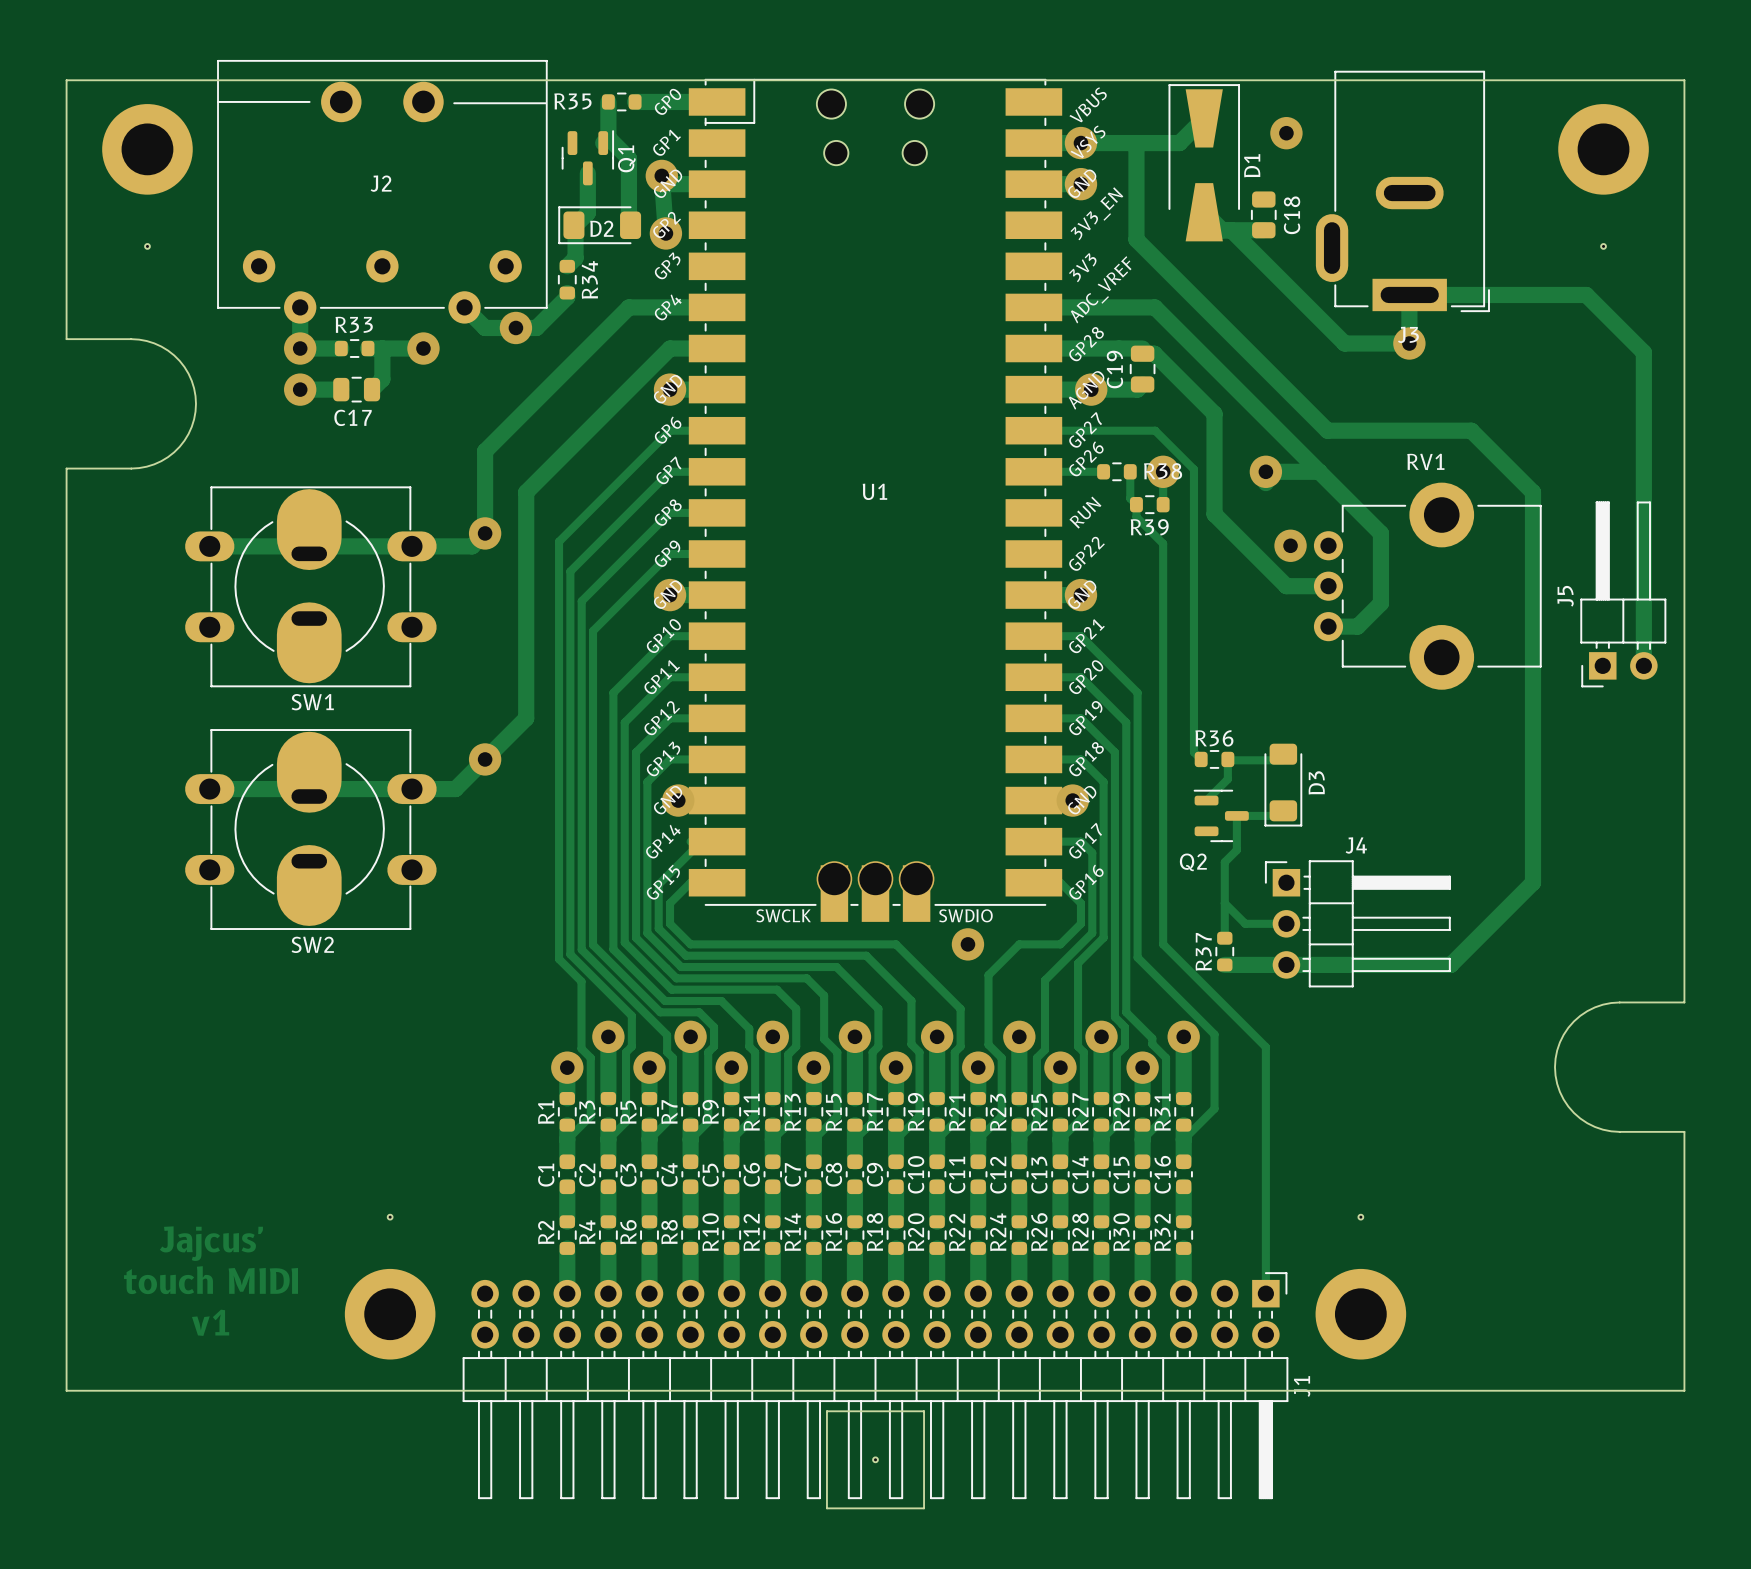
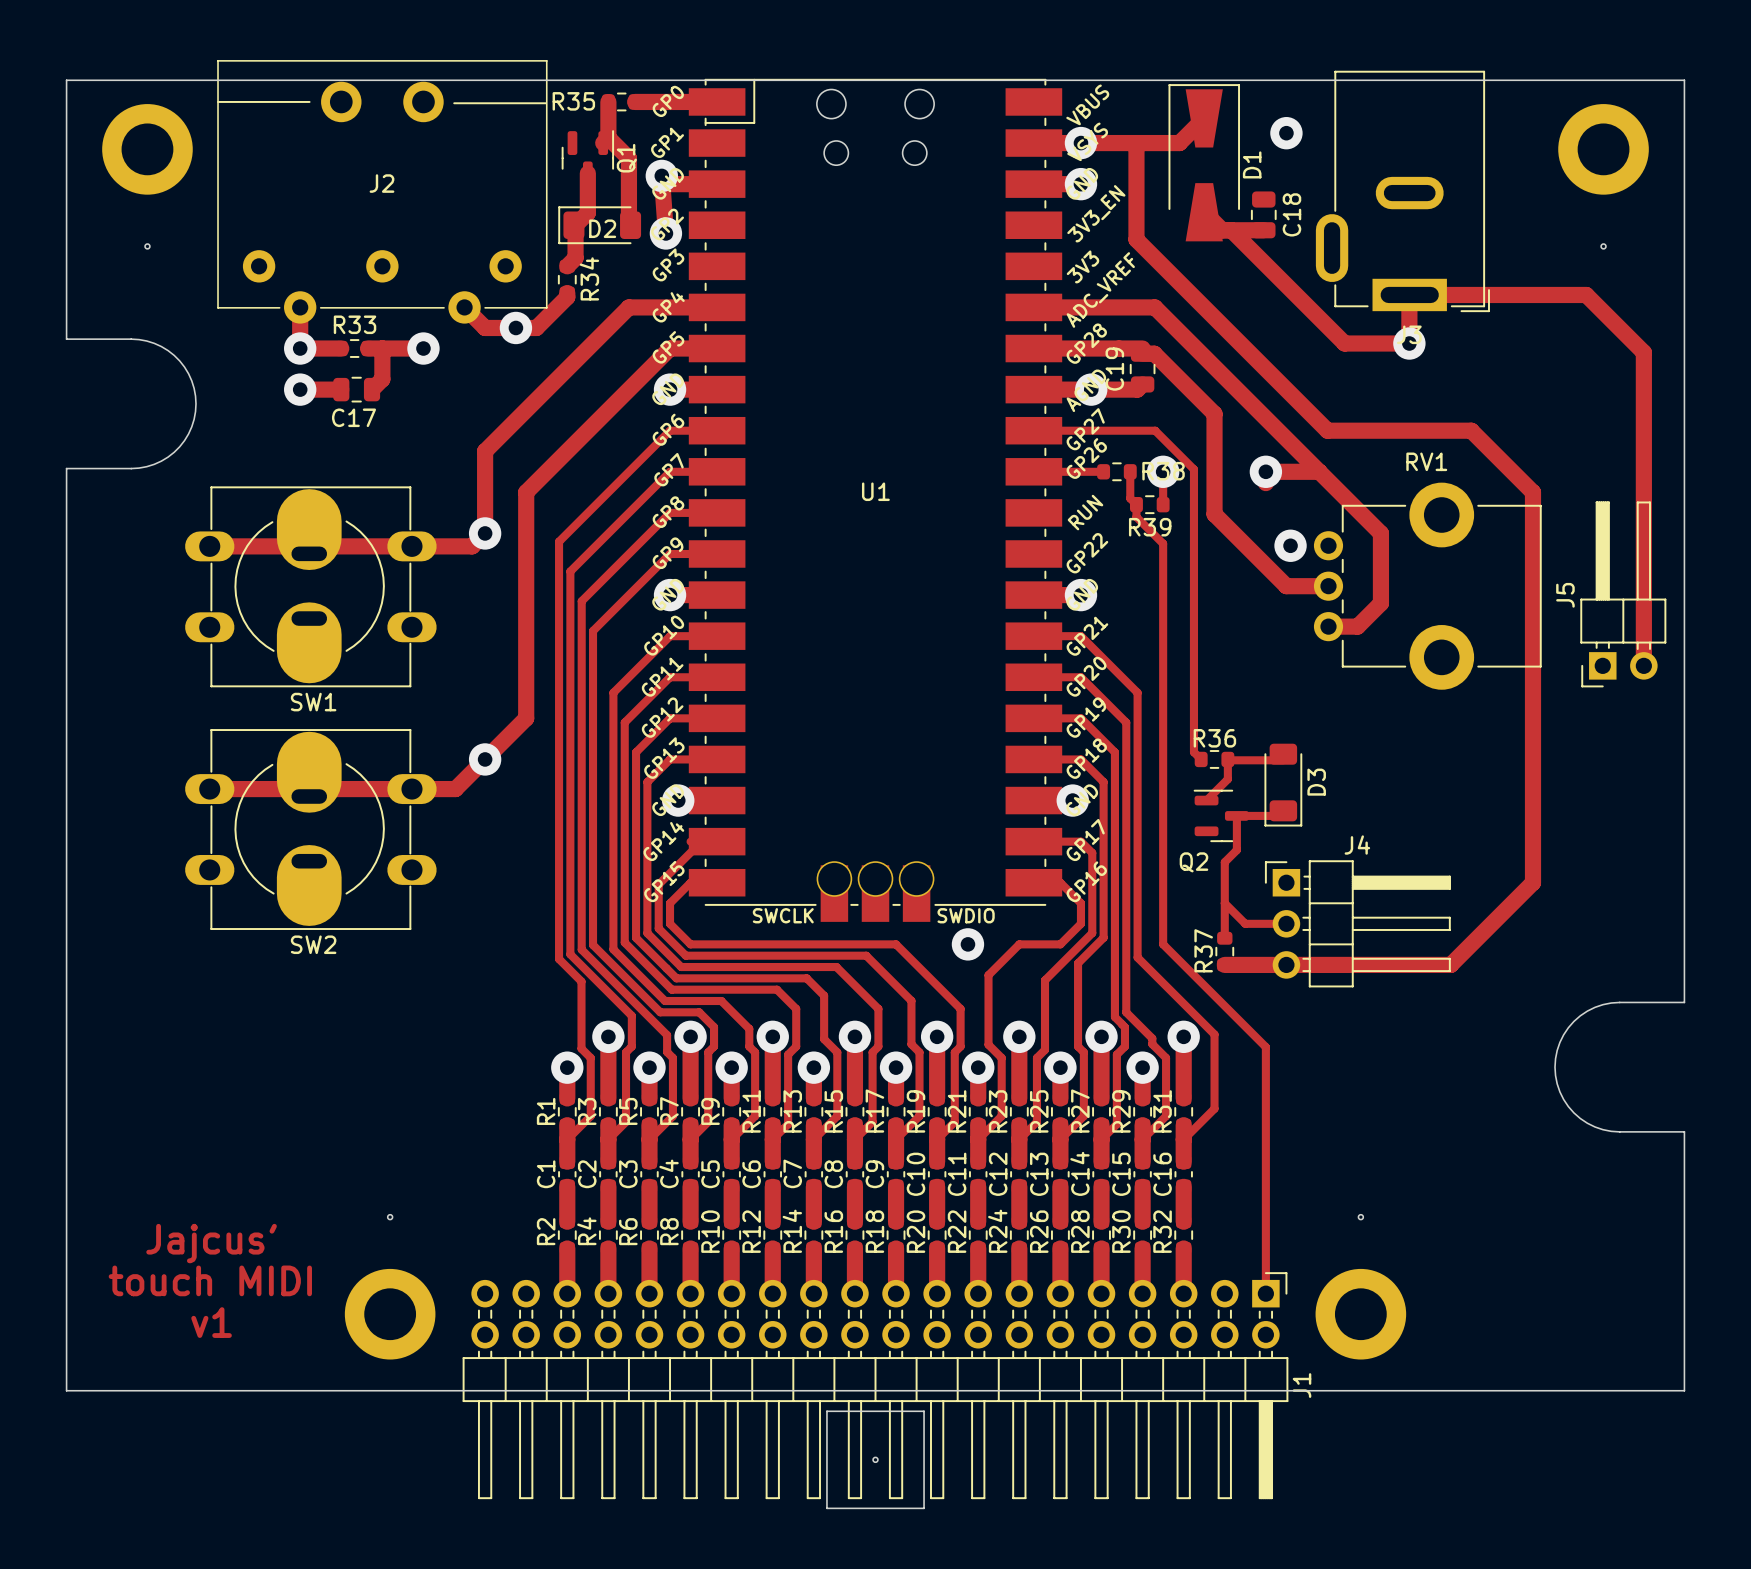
U1 text: none -> GP5 (668, 347)

